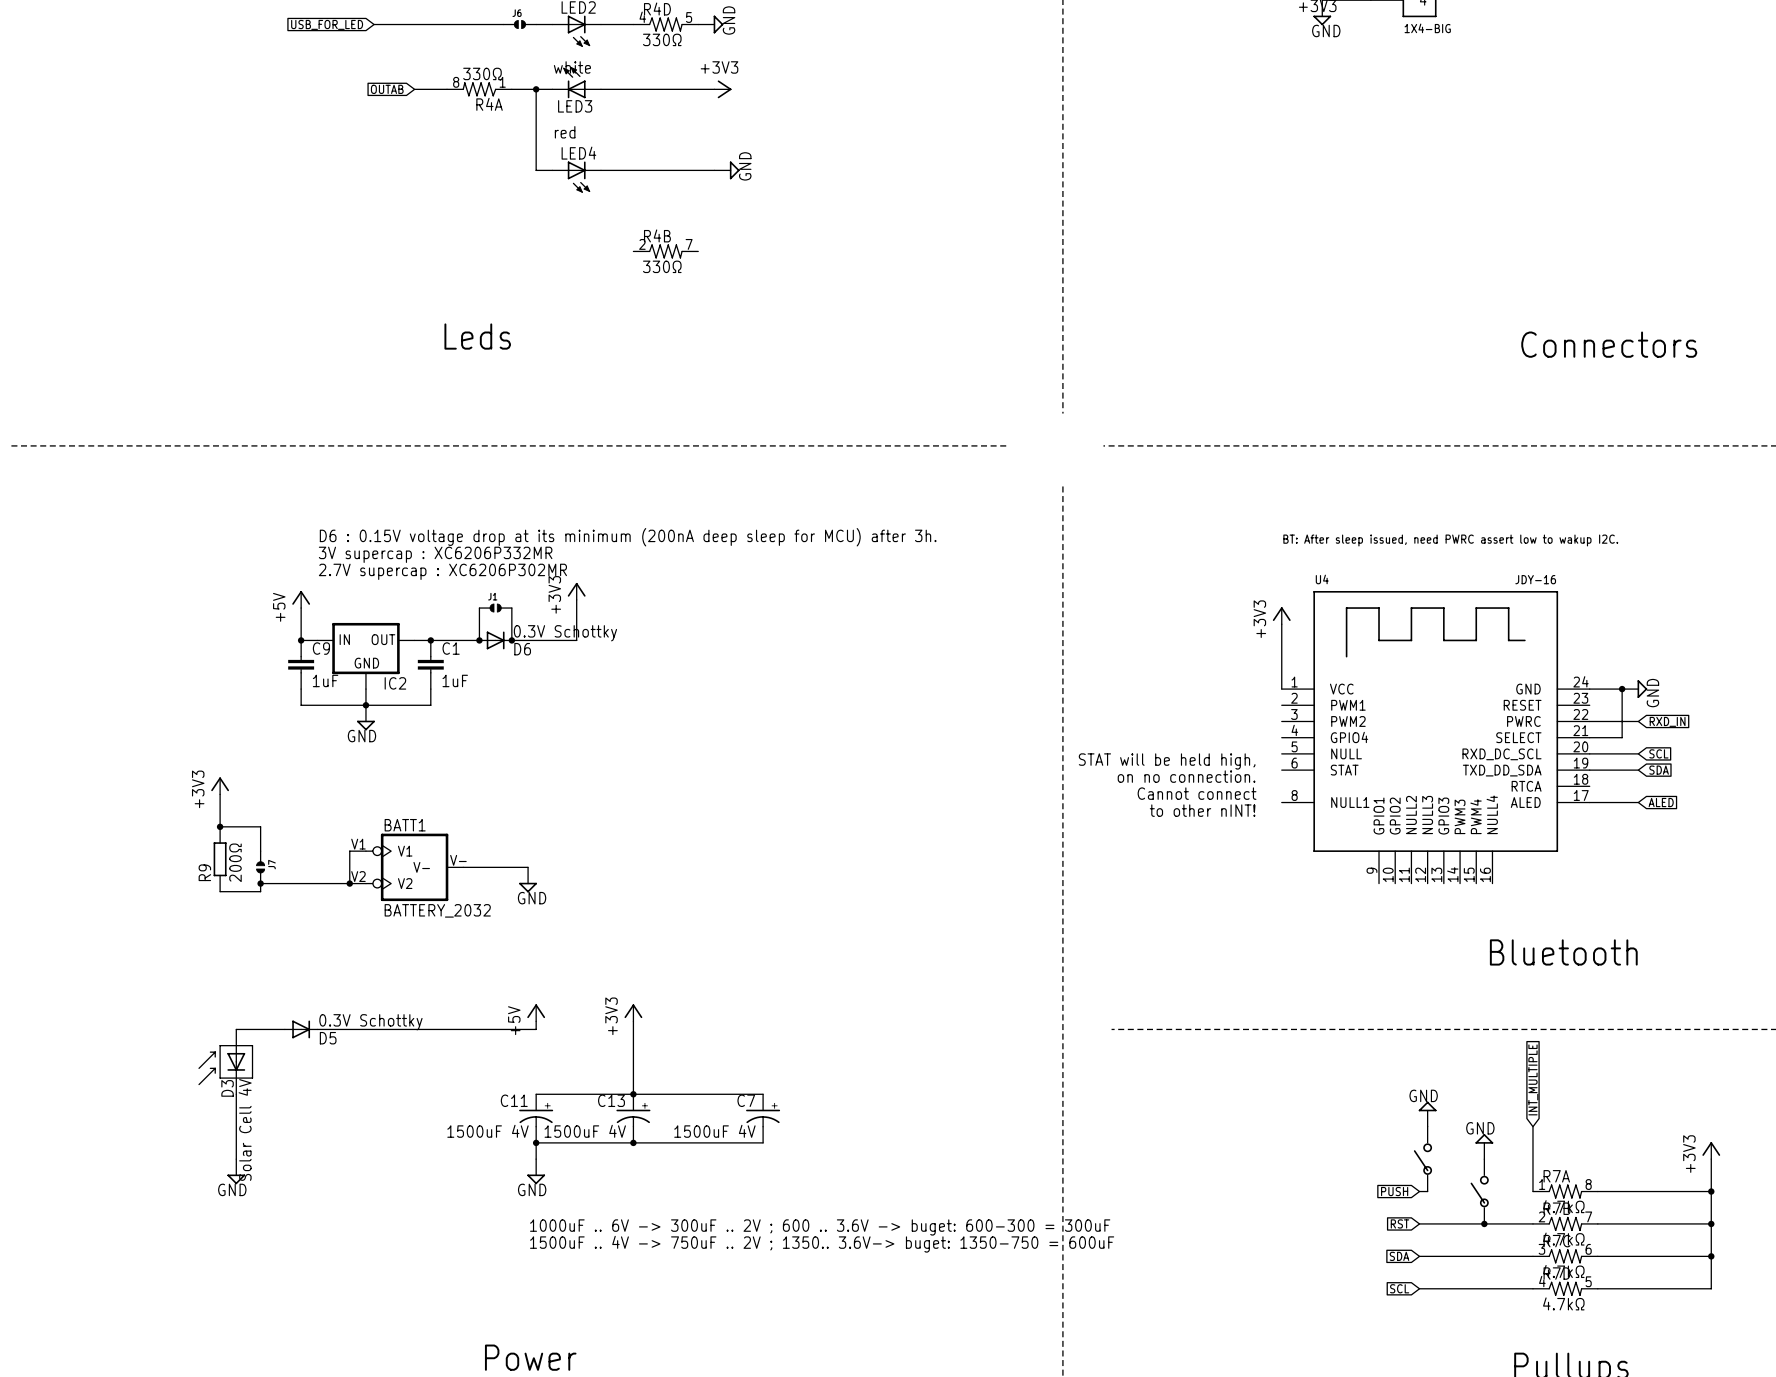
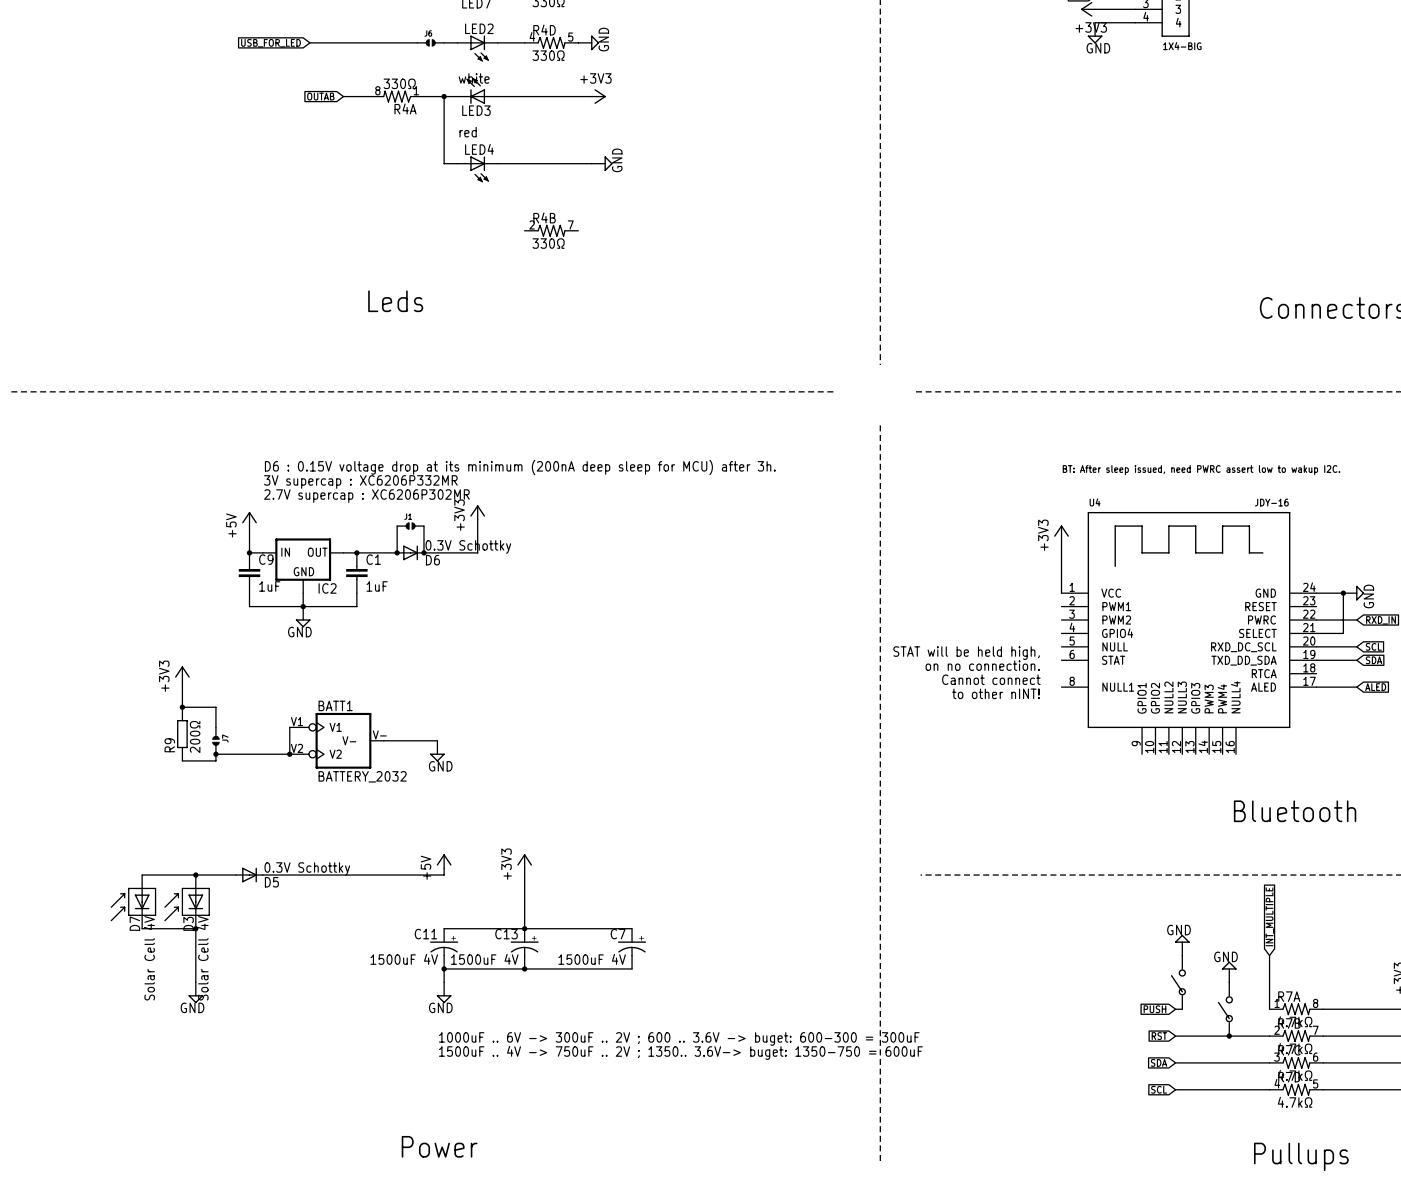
wire: none -> (142, 875) (195, 875)
junction: none -> (195, 875)
D7: none -> Solar Cell 4V (133, 901)
wire: none -> (142, 928) (195, 928)
junction: none -> (195, 928)

